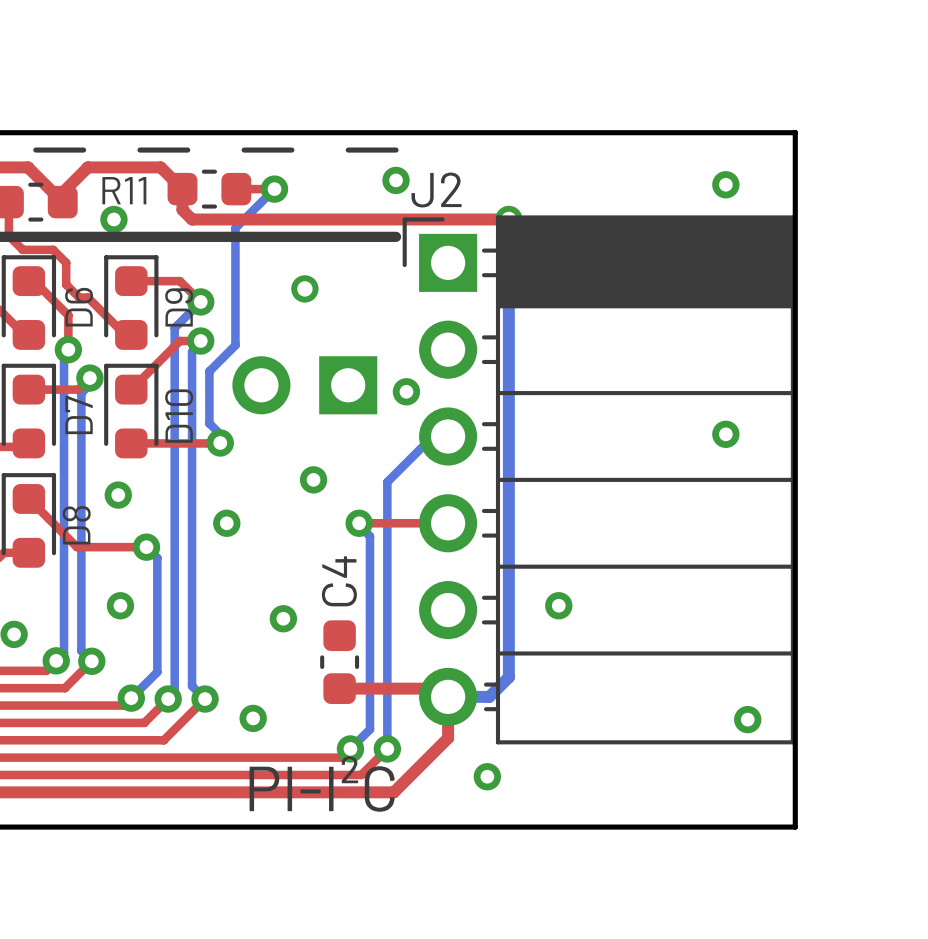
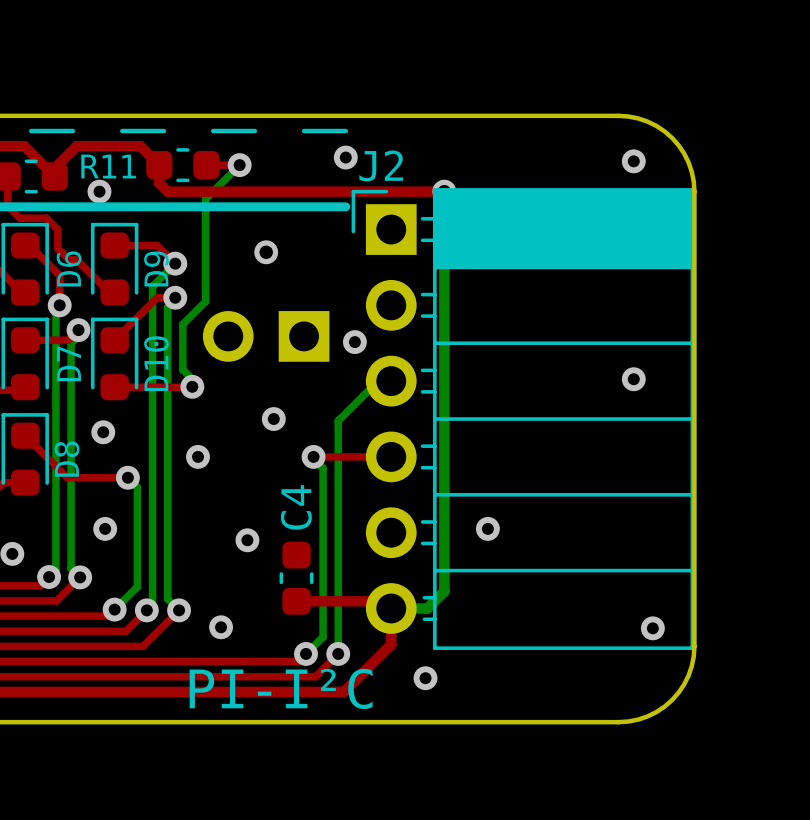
board edge: (708, 132) (795, 132) (795, 219) -> (618, 115) (647, 121) (672, 138) (688, 162) (694, 191)
board edge: (795, 740) (795, 827) (708, 827) -> (694, 646) (688, 675) (672, 699) (647, 716) (618, 722)

